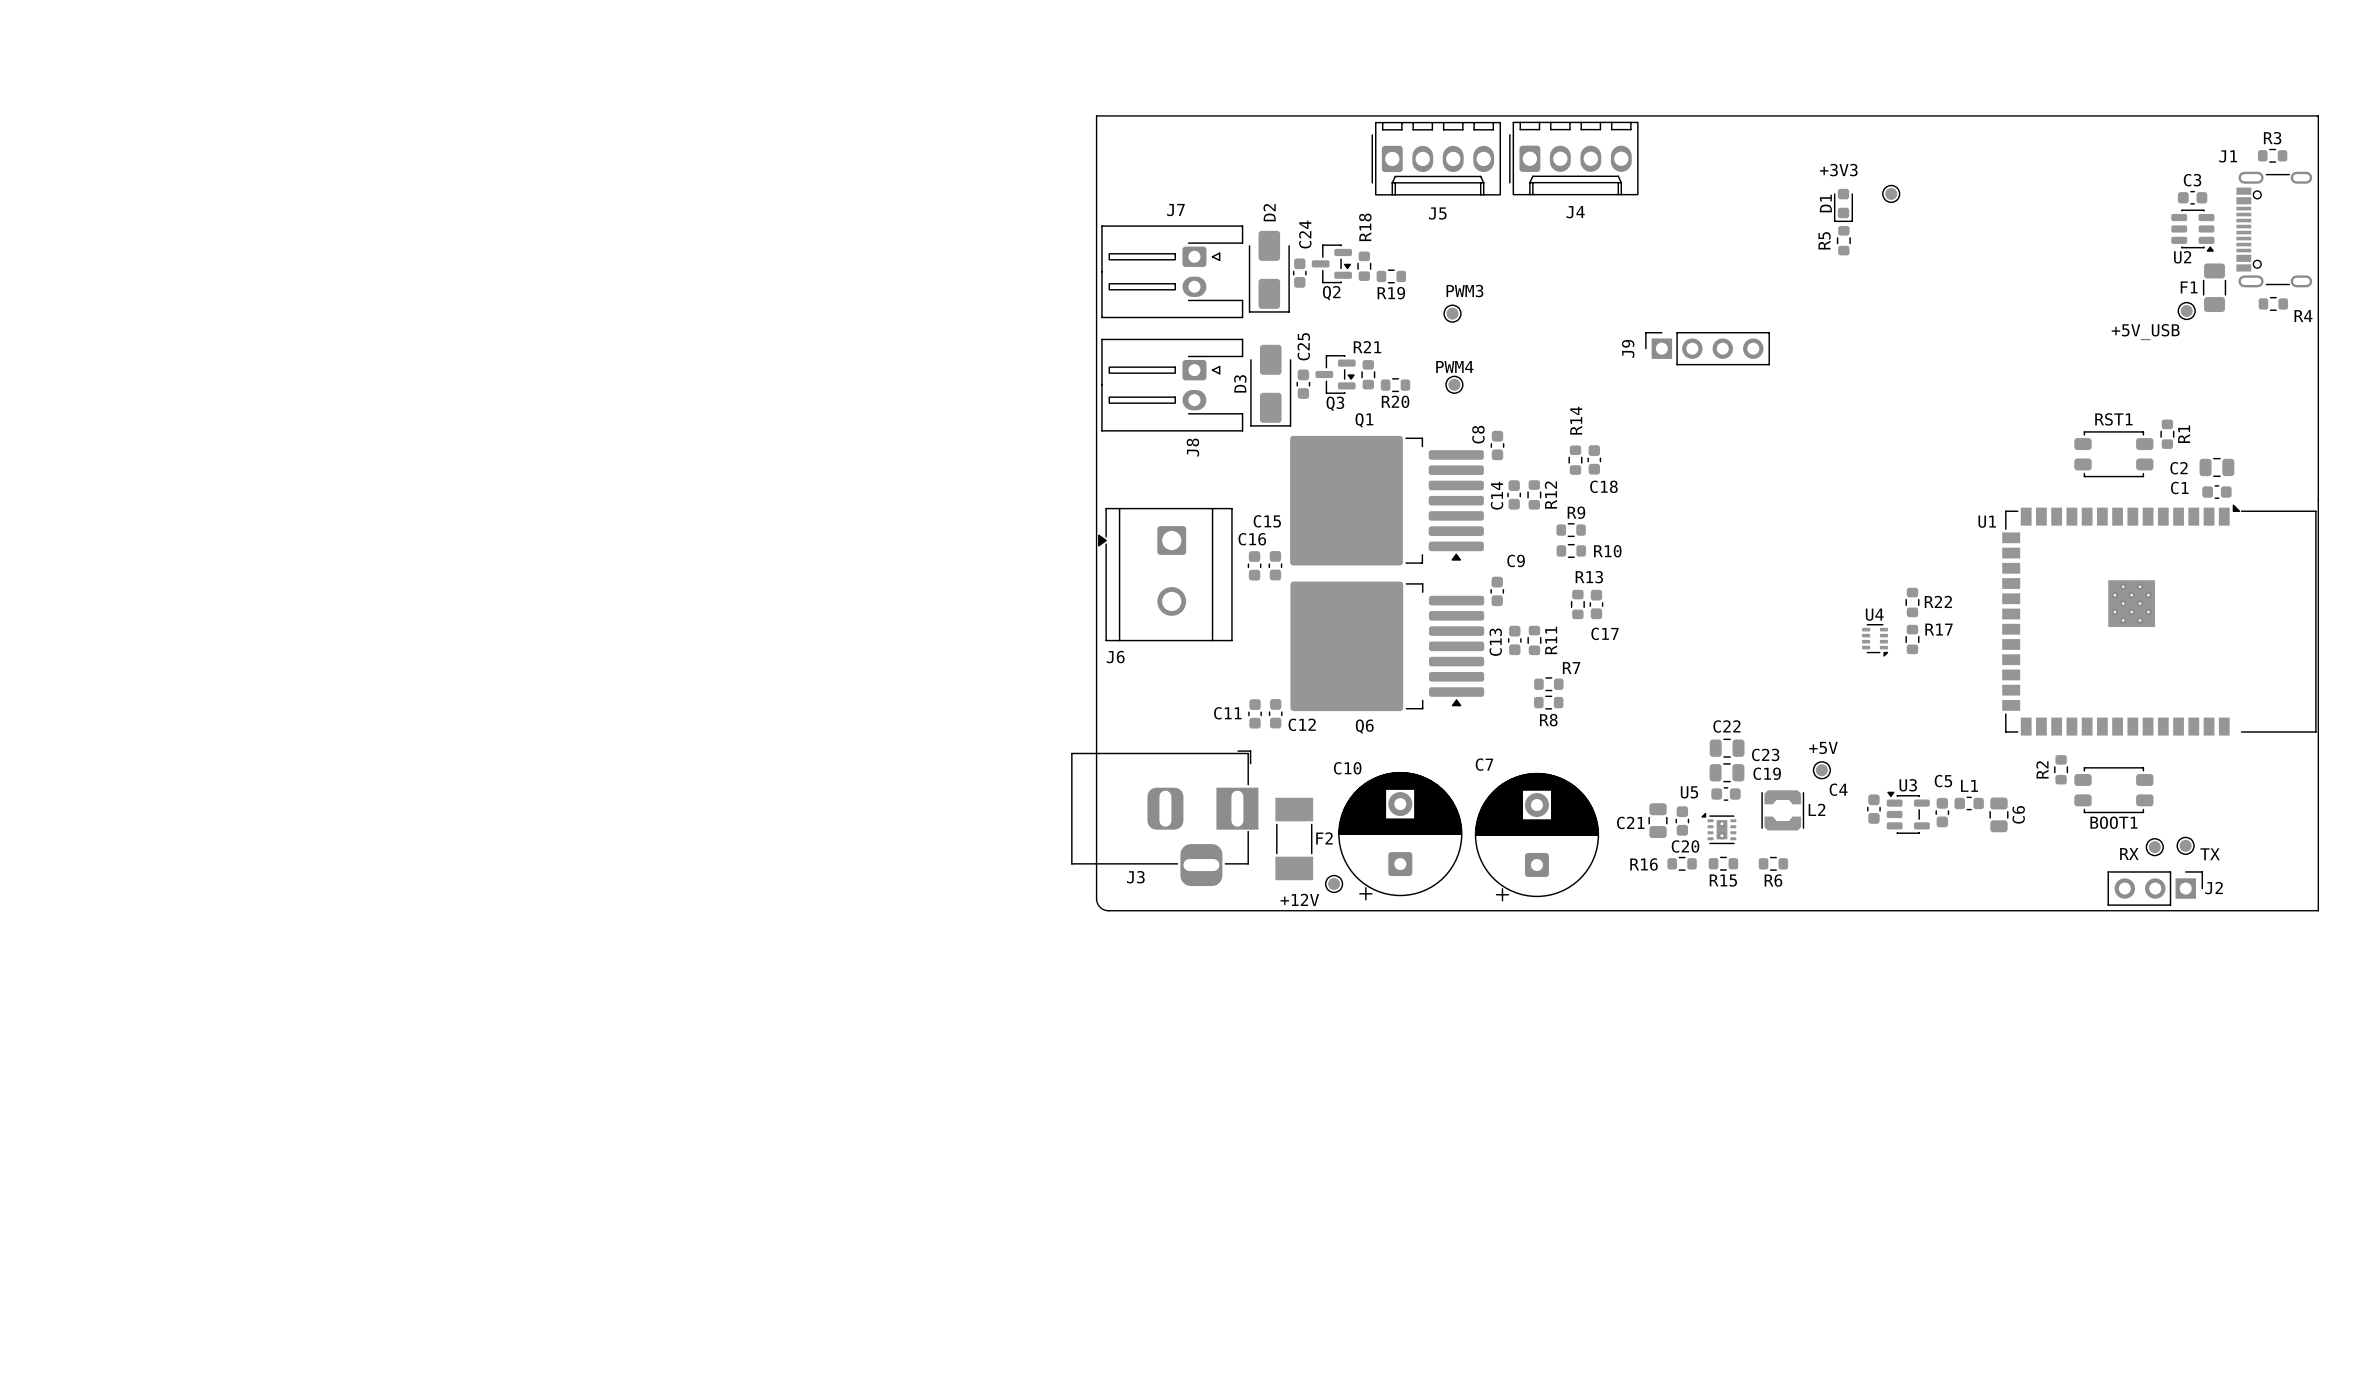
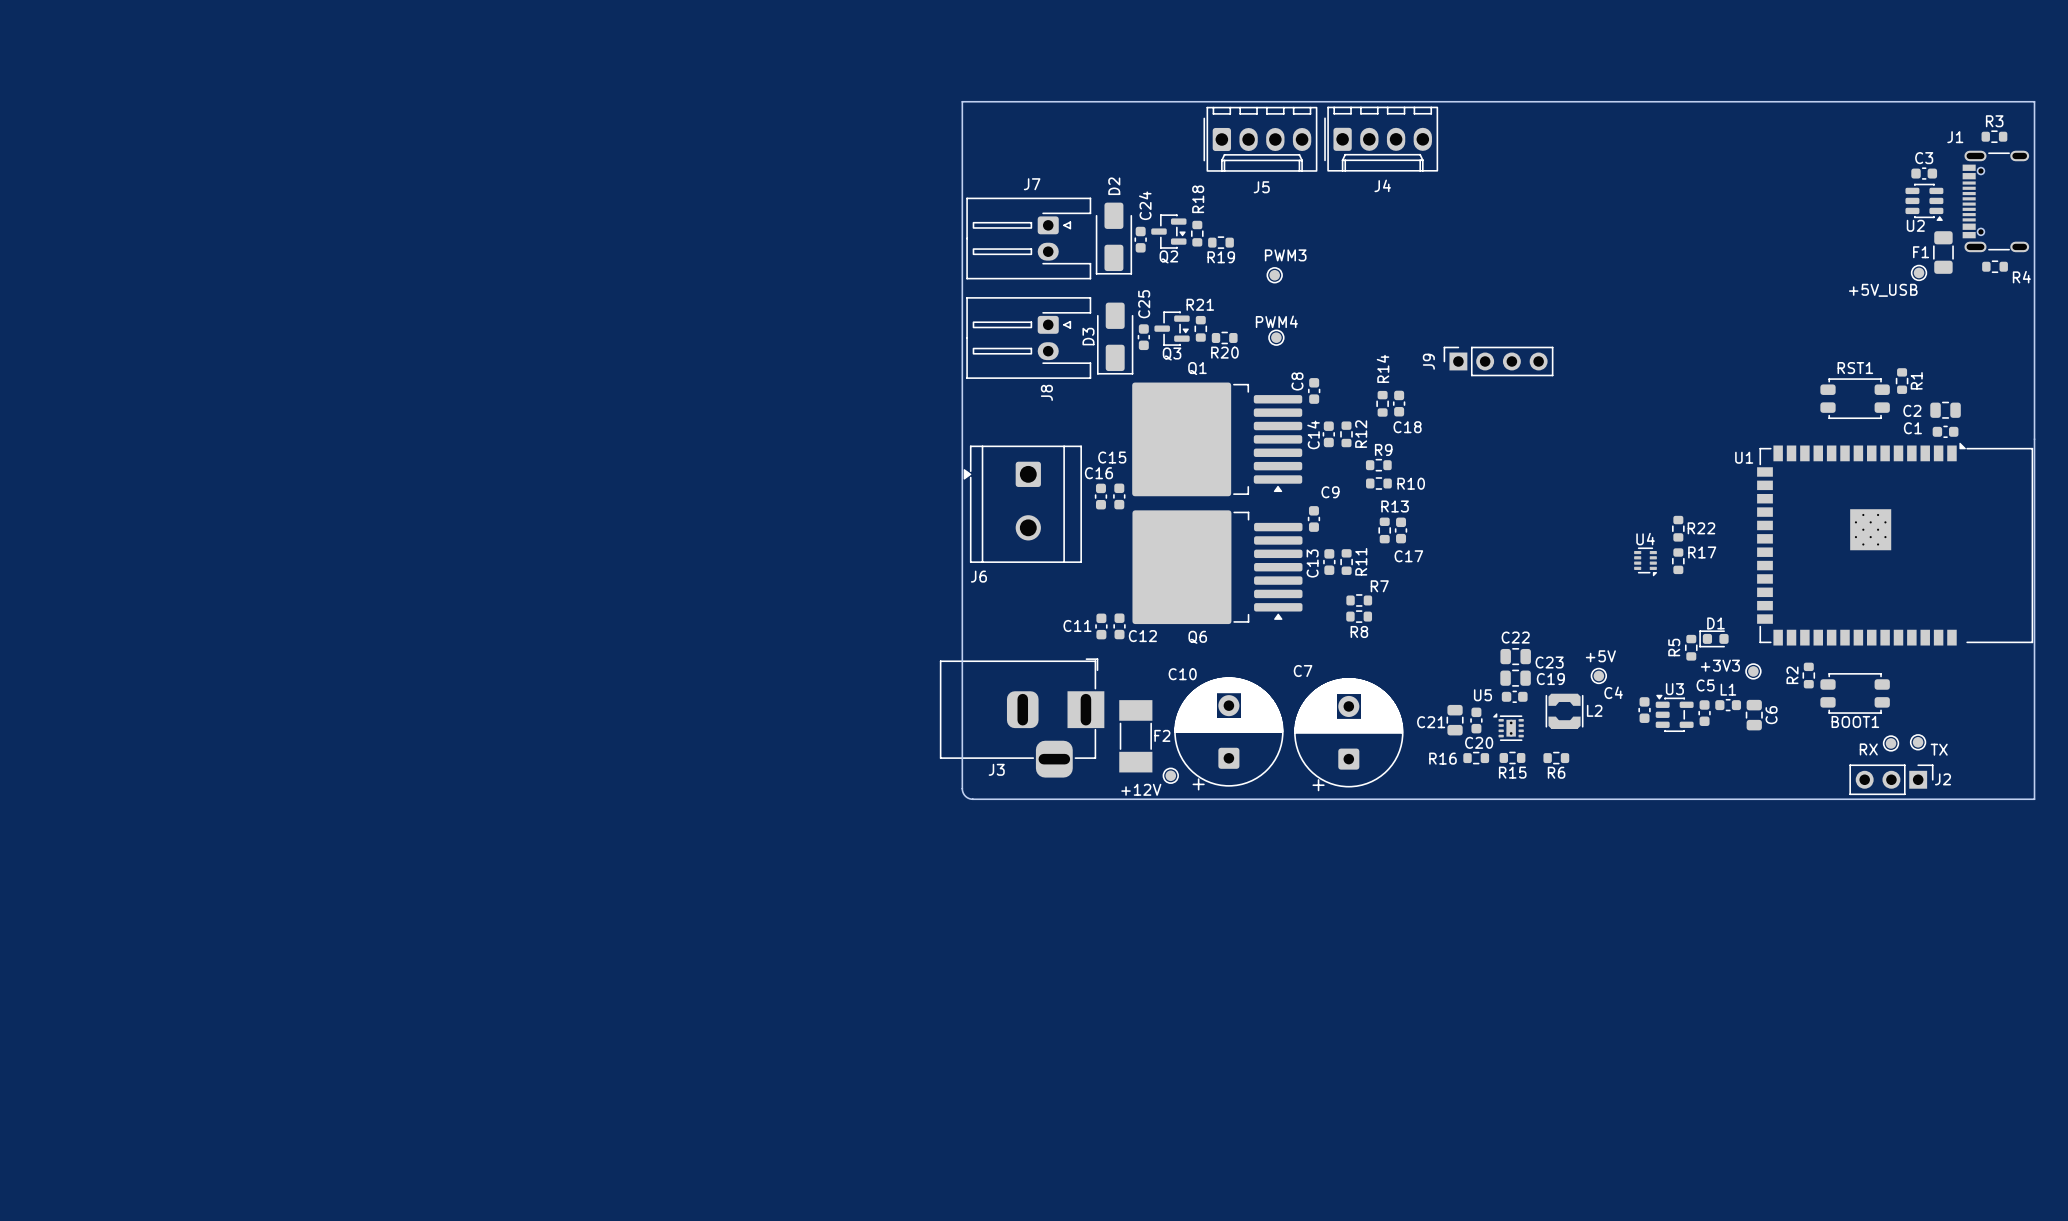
text: +3V3 (1838, 170) -> none
part: (1891, 193) -> none
D1 rotation: 0° (1843, 205) -> 90° clockwise (1714, 638)
D1 position: (1843, 205) -> (1714, 638)
R5 position: (1843, 240) -> (1691, 647)
J9 position: (1707, 348) -> (1498, 361)
+3V3: none -> (1753, 671)

